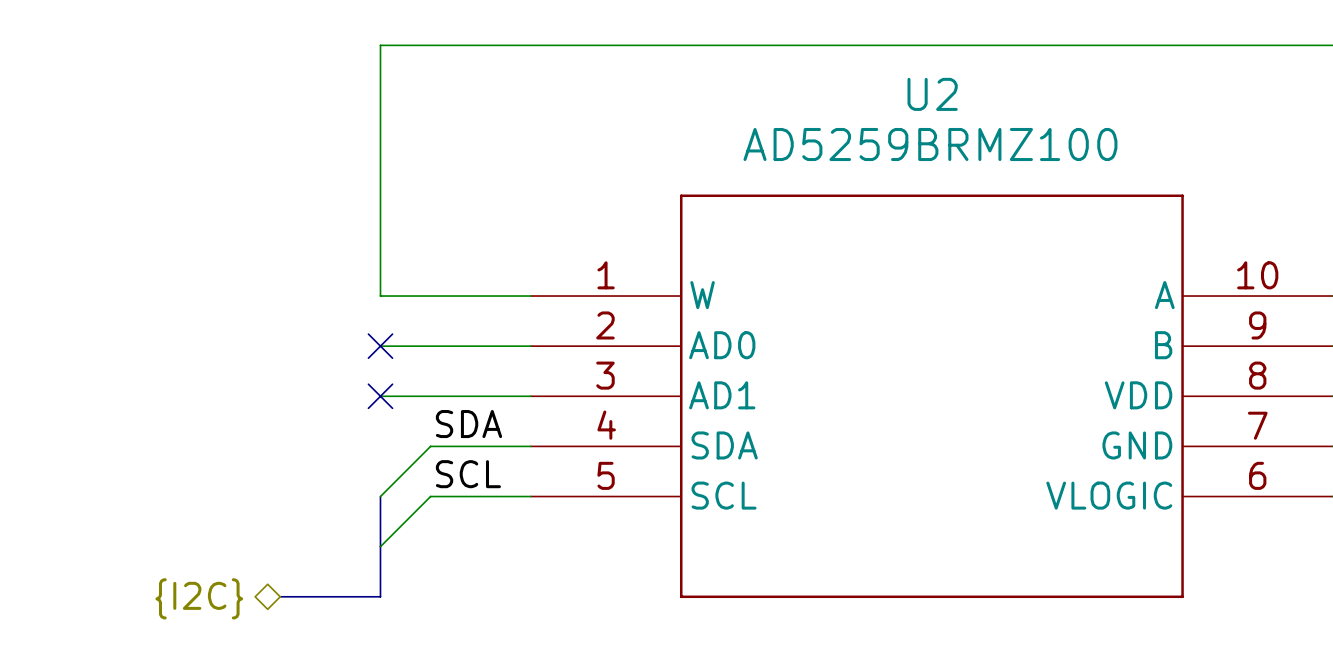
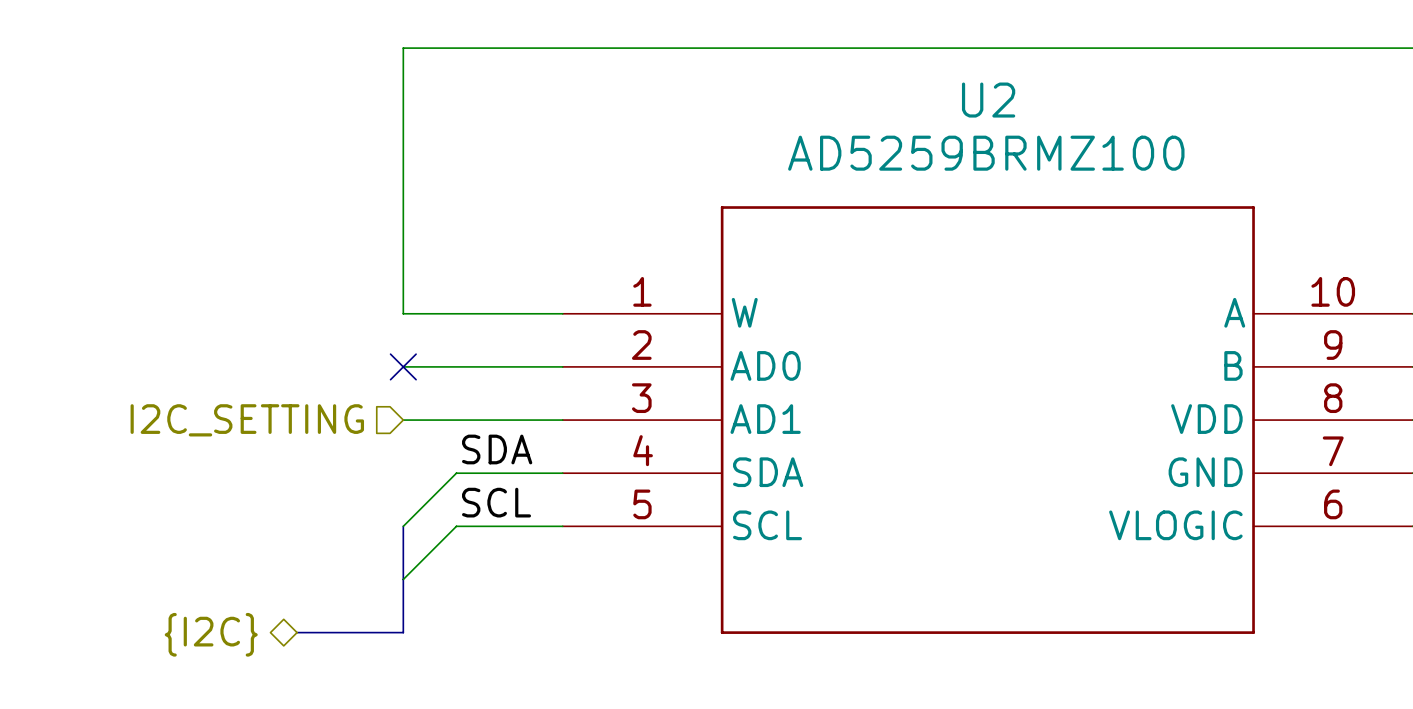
hierarchical label: none -> I2C_SETTING (247, 420)
no-connect mark: (380, 396) -> none

